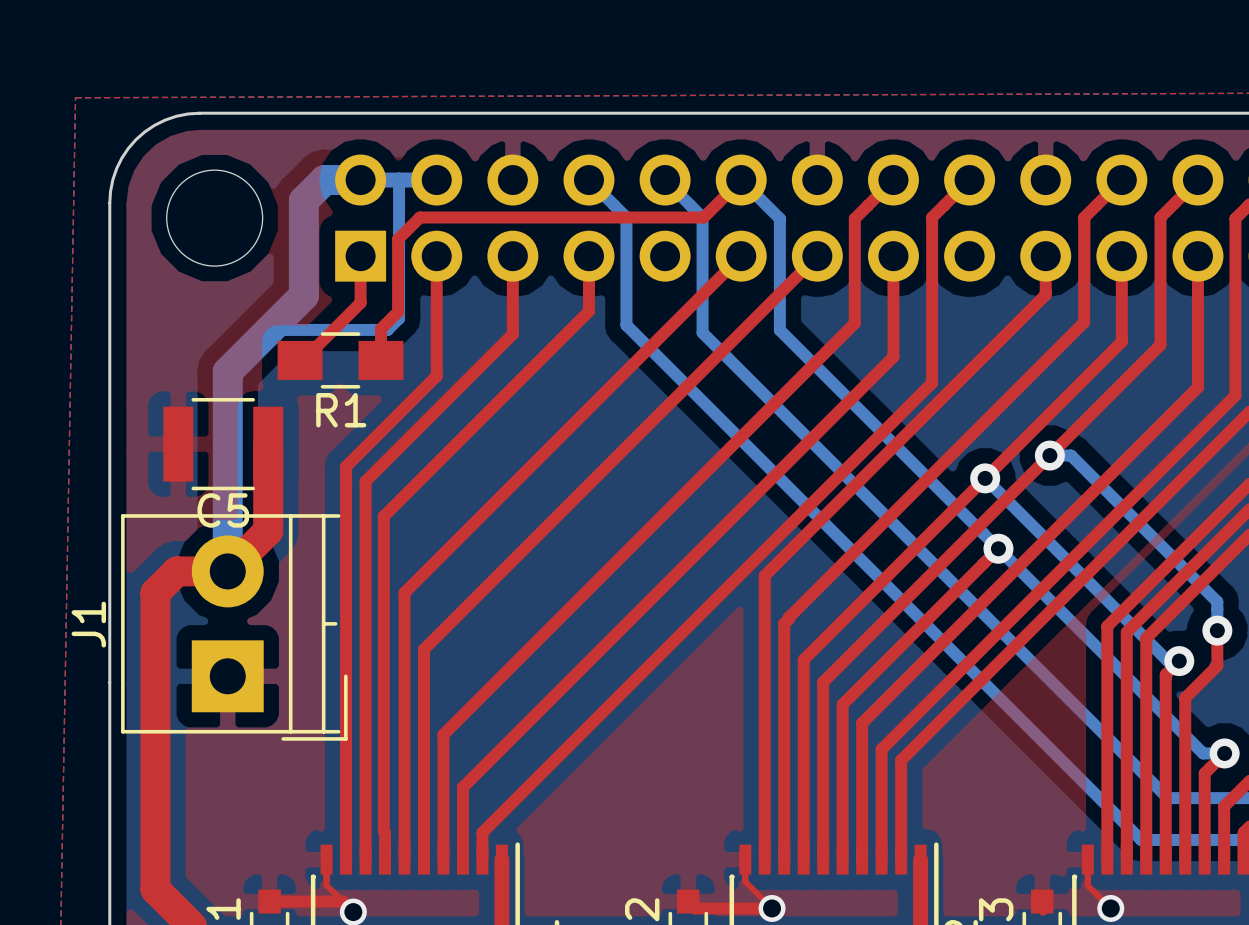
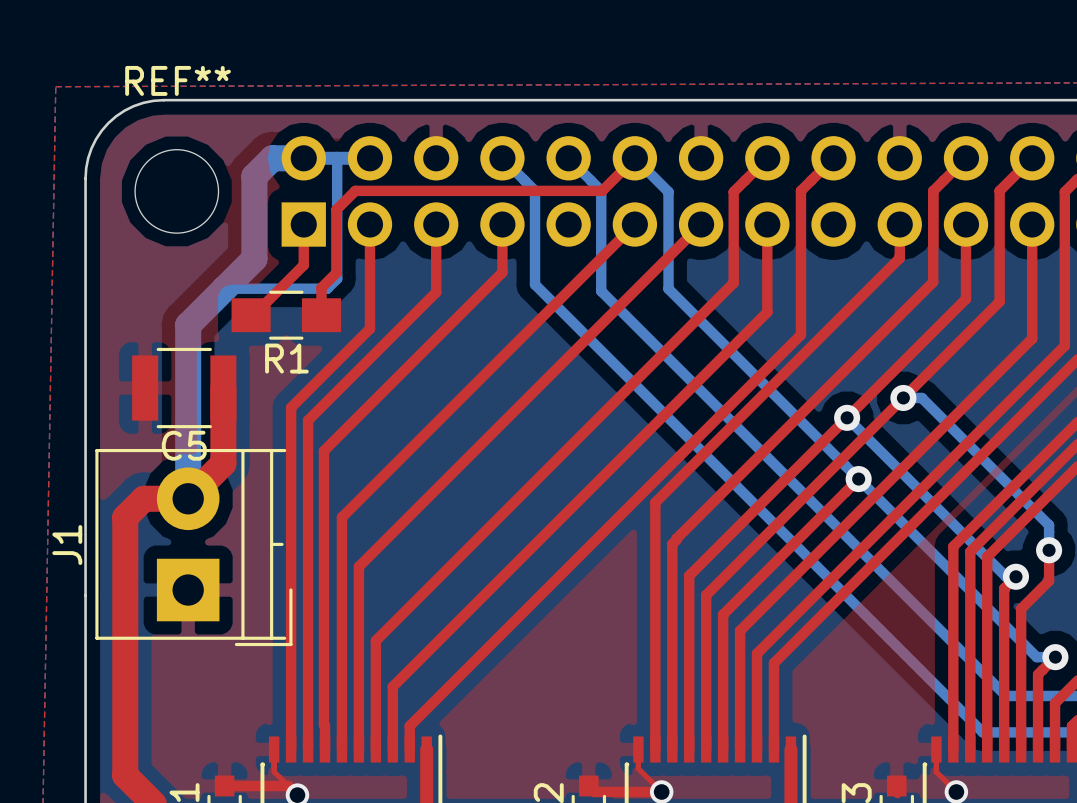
REF** name: none -> REF** (178, 80)

